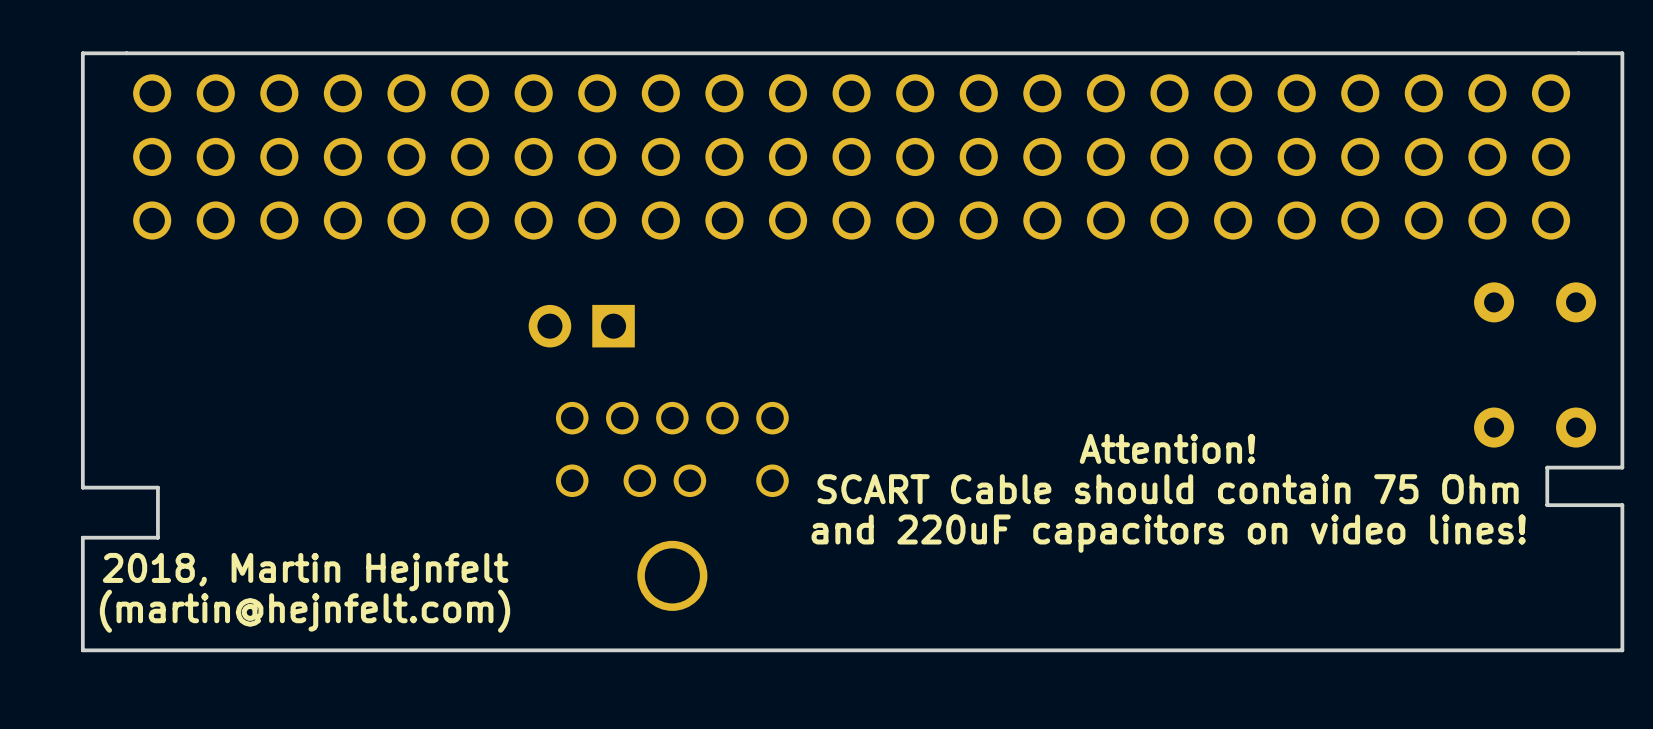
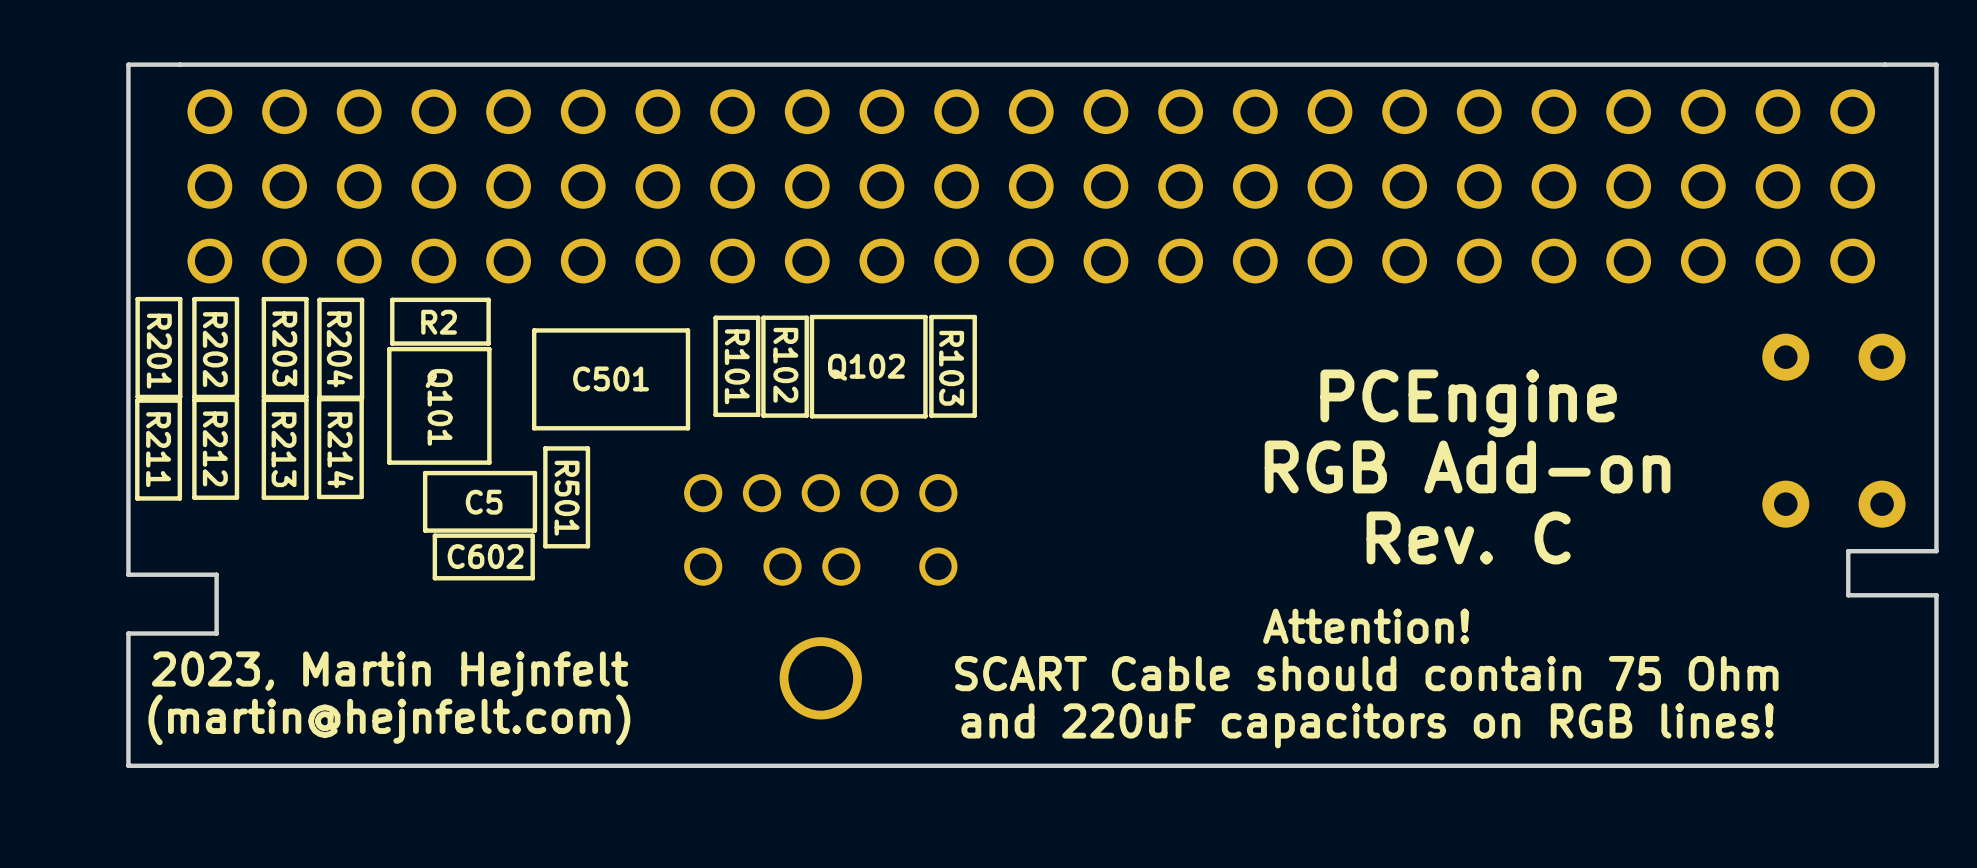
line: none -> (180, 299) (137, 299) (137, 396) (180, 396) (180, 299)
line: none -> (236, 299) (194, 299) (194, 396) (236, 396) (236, 299)
line: none -> (306, 299) (263, 299) (263, 396) (306, 396) (306, 299)
line: none -> (362, 299) (319, 299) (319, 397) (362, 397) (362, 299)
line: none -> (488, 299) (392, 299) (392, 343) (488, 343) (488, 299)
line: none -> (758, 317) (715, 317) (715, 414) (758, 414) (758, 317)
line: none -> (806, 317) (763, 317) (763, 415) (806, 415) (806, 317)
line: none -> (925, 317) (811, 317) (811, 416) (925, 416) (925, 317)
line: none -> (974, 317) (931, 317) (931, 415) (974, 415) (974, 317)
R2: none -> (439, 322)
line: none -> (687, 330) (534, 330) (534, 428) (687, 428) (687, 330)
R202: none -> (215, 349)
R203: none -> (284, 348)
R204: none -> (339, 349)
line: none -> (489, 349) (389, 349) (389, 462) (489, 462) (489, 349)
R201: none -> (159, 351)
R102: none -> (785, 365)
R101: none -> (737, 366)
Q102: none -> (866, 367)
R103: none -> (951, 368)
C501: none -> (611, 378)
part: (581, 326) -> none
line: none -> (236, 399) (194, 399) (194, 497) (236, 497) (236, 399)
line: none -> (306, 399) (263, 399) (263, 497) (306, 497) (306, 399)
line: none -> (361, 399) (319, 399) (319, 496) (361, 496) (361, 399)
line: none -> (179, 400) (137, 400) (137, 498) (179, 498) (179, 400)
text: none -> PCEngine (1468, 403)
Q101: none -> (439, 407)
R212: none -> (215, 448)
line: none -> (587, 448) (545, 448) (545, 546) (587, 546) (587, 448)
R211: none -> (158, 449)
R213: none -> (284, 449)
R214: none -> (340, 450)
text: none -> RGB Add-on (1467, 466)
line: none -> (534, 473) (425, 473) (425, 530) (534, 530) (534, 473)
R501: none -> (567, 498)
C5: none -> (484, 502)
text position: Attention! (1167, 448) -> Attention! (1366, 626)
line: none -> (532, 535) (532, 578) (434, 578) (434, 535) (532, 535)
text: none -> Rev. C (1468, 537)
C602: none -> (485, 556)
text position: SCART Cable should contain 75 Ohm (1168, 489) -> SCART Cable should contain 75 Ohm (1366, 673)
text: and 220uF capacitors on video lines! (1168, 533) -> none
text: 2018, Martin Hejnfelt (305, 572) -> 2023, Martin Hejnfelt (390, 673)
text: none -> and 220uF capacitors on RGB lines! (1367, 725)

